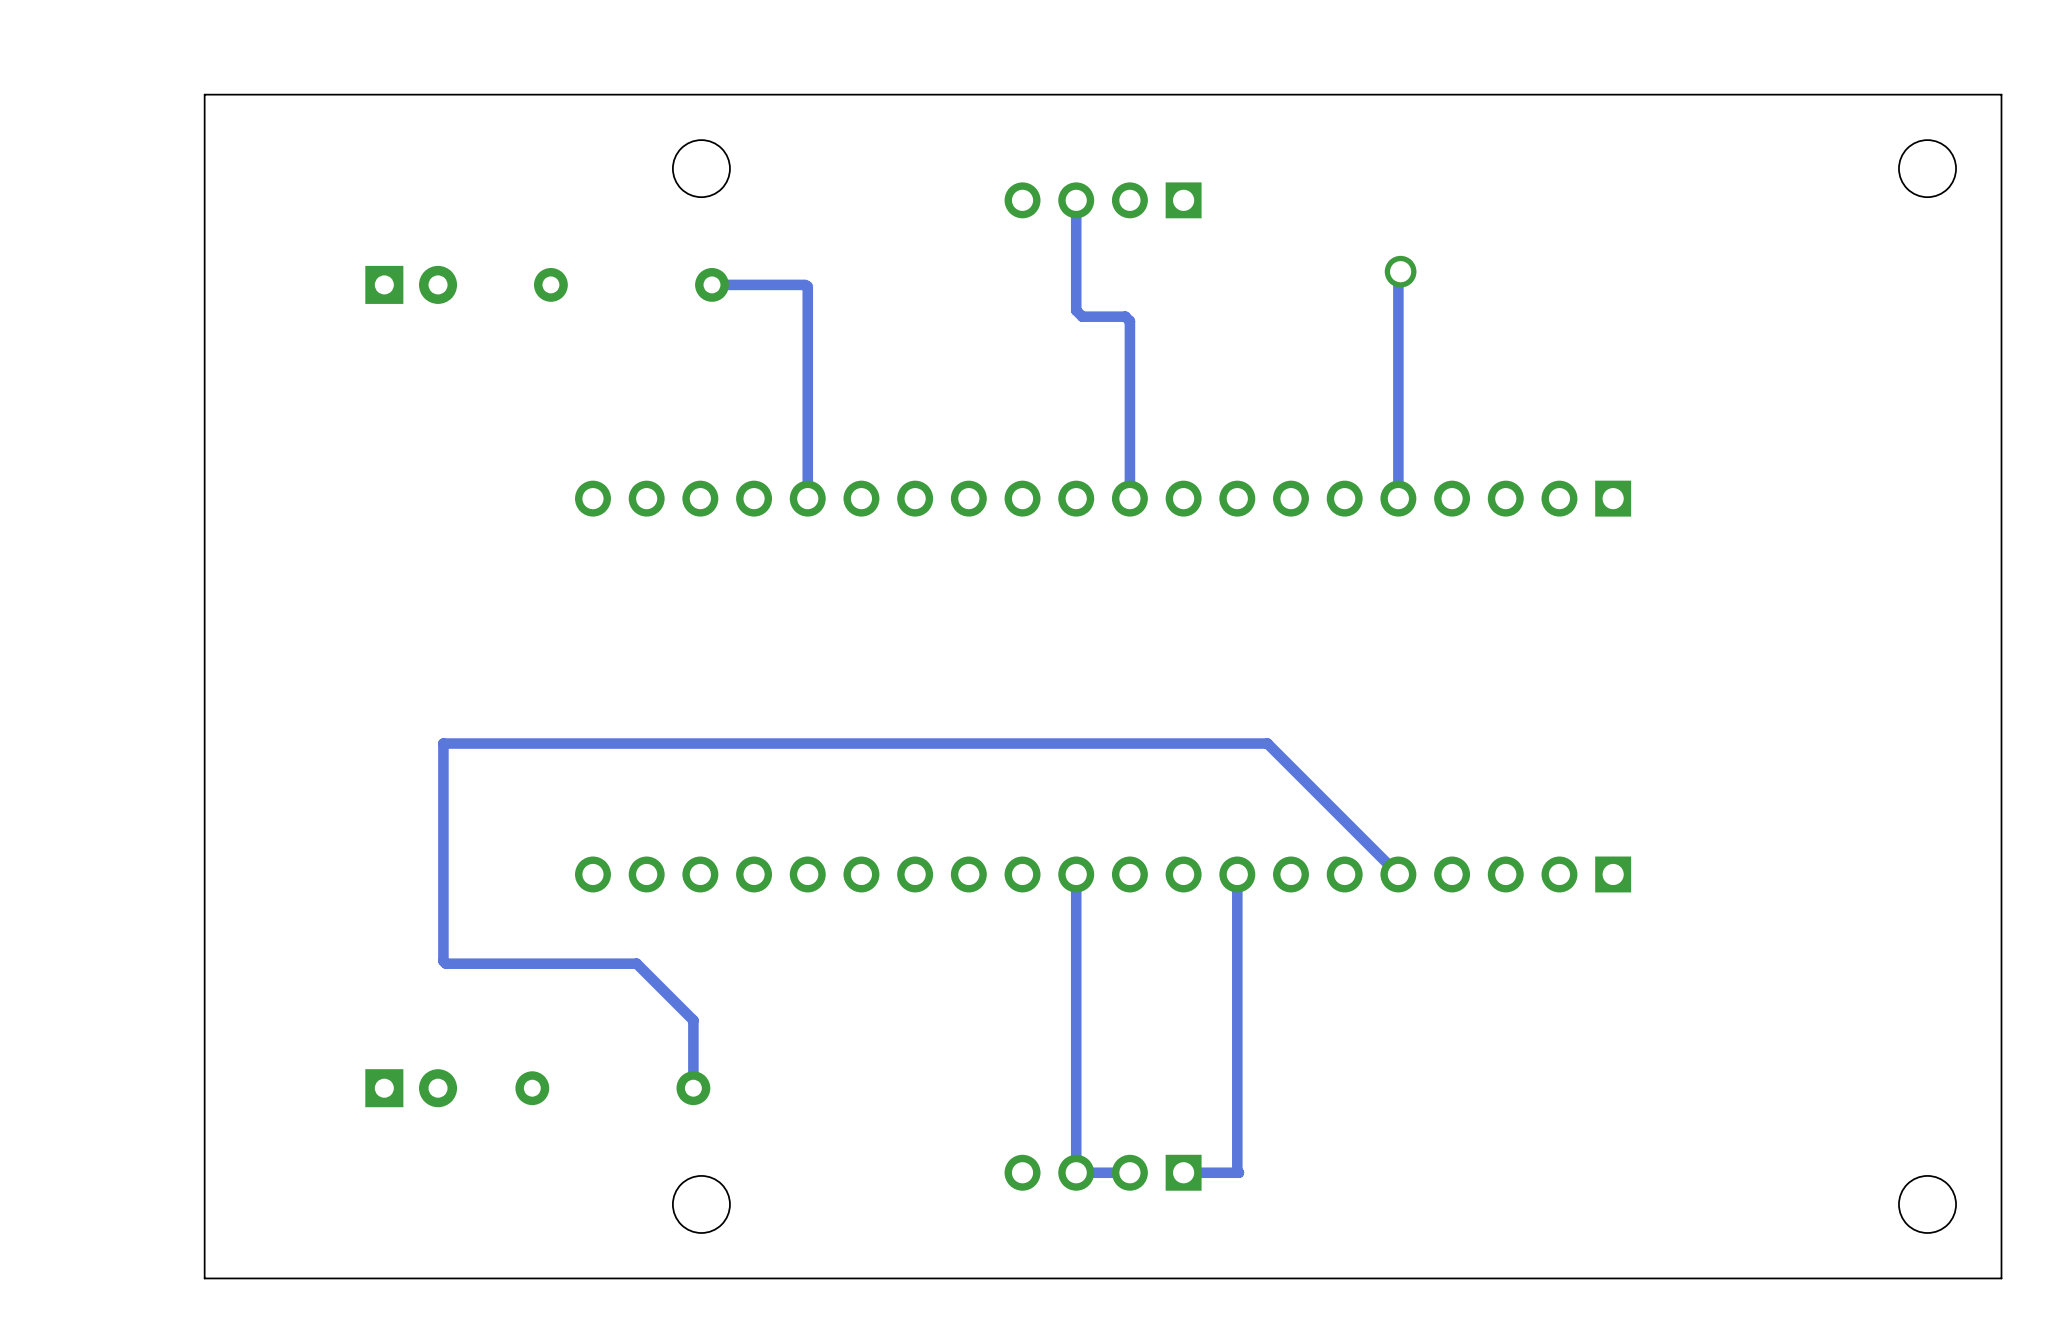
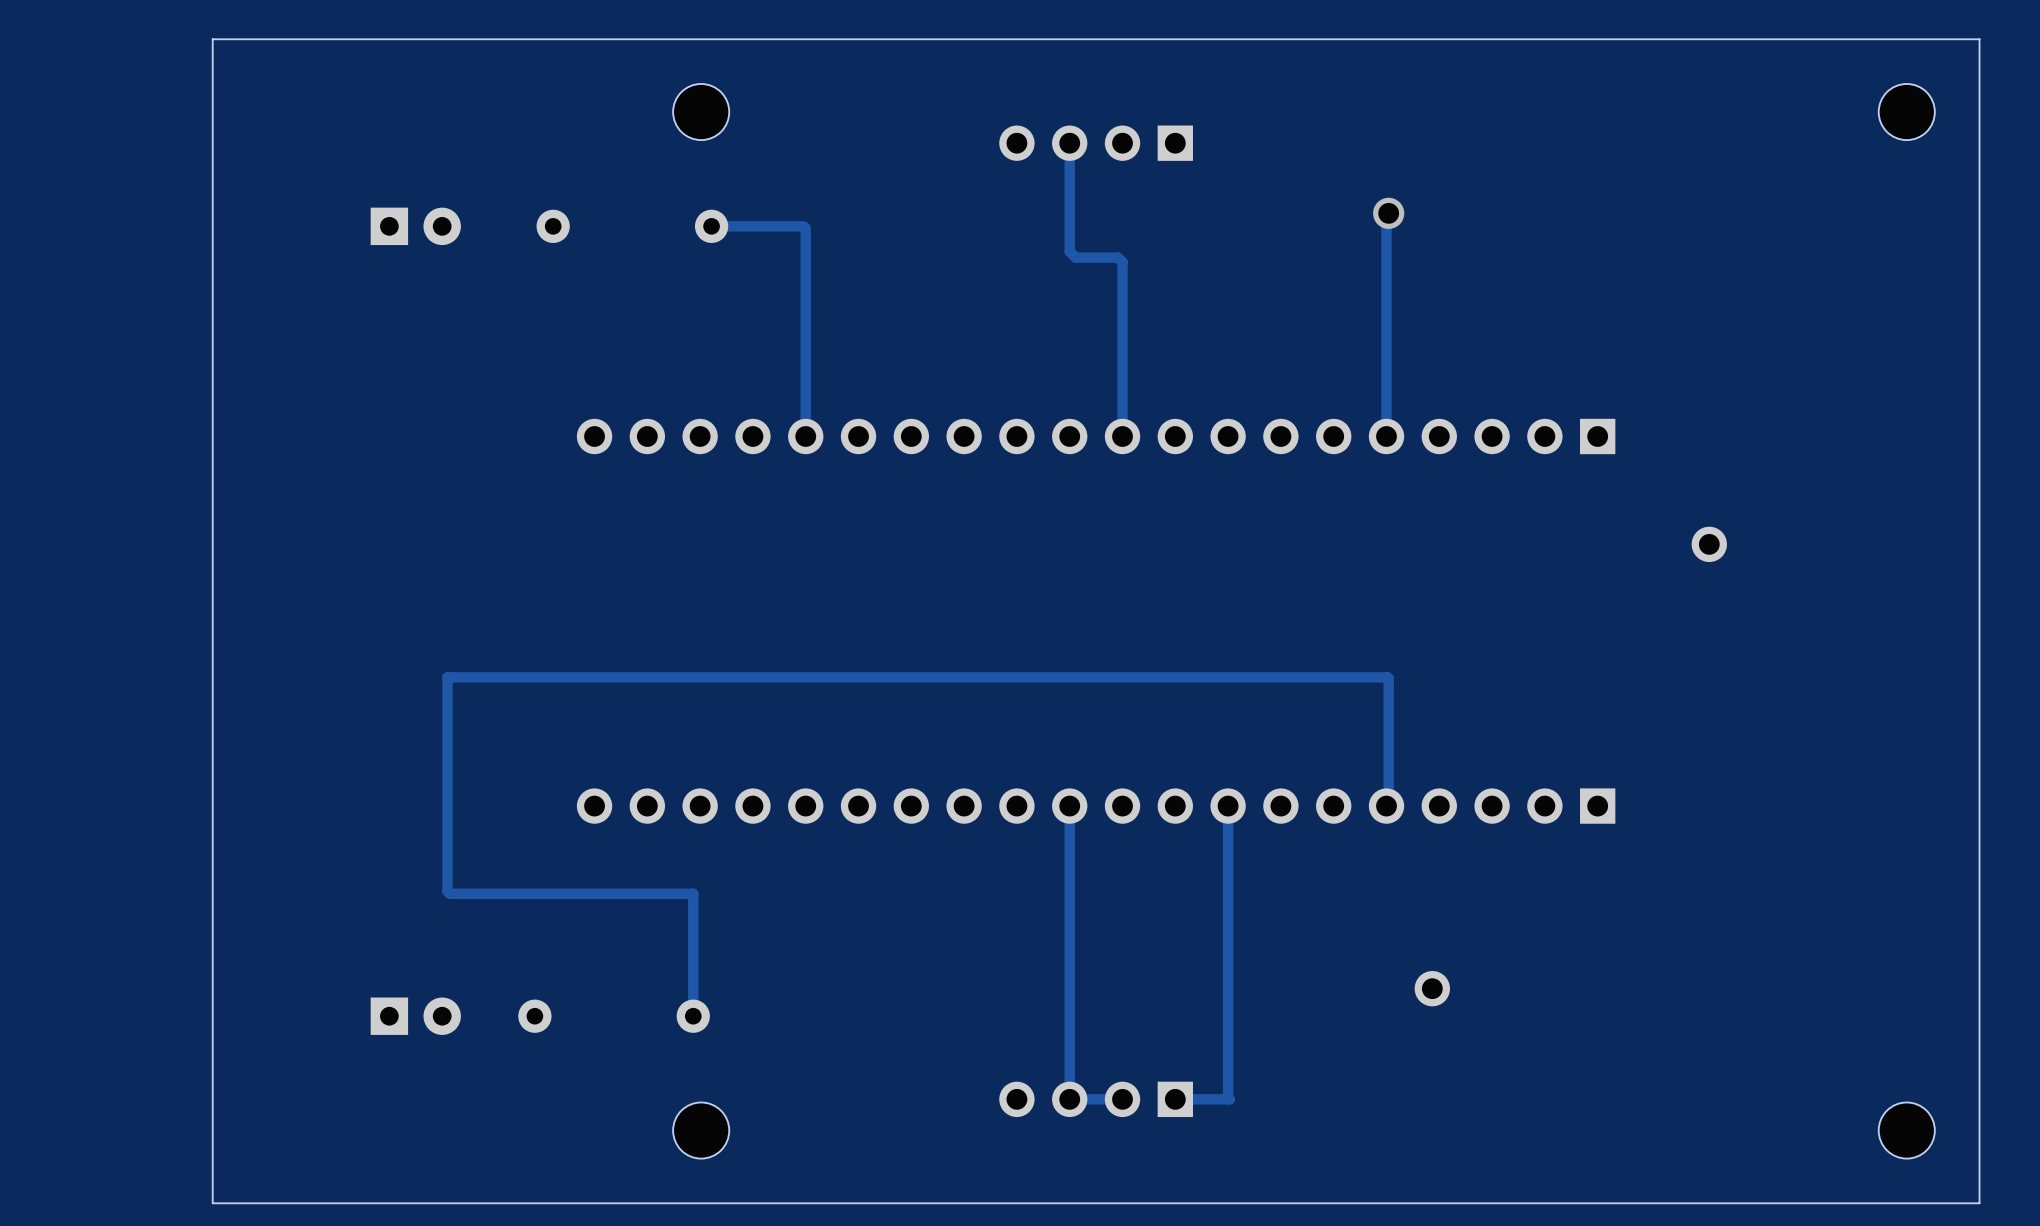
part: none -> (1709, 544)
track: (1267, 743) (1398, 874) -> (1257, 677) (1388, 678) (1388, 803) (1386, 806)
track: (636, 963) (693, 1020) -> (637, 893) (693, 893) (693, 949)
part: none -> (1432, 988)

